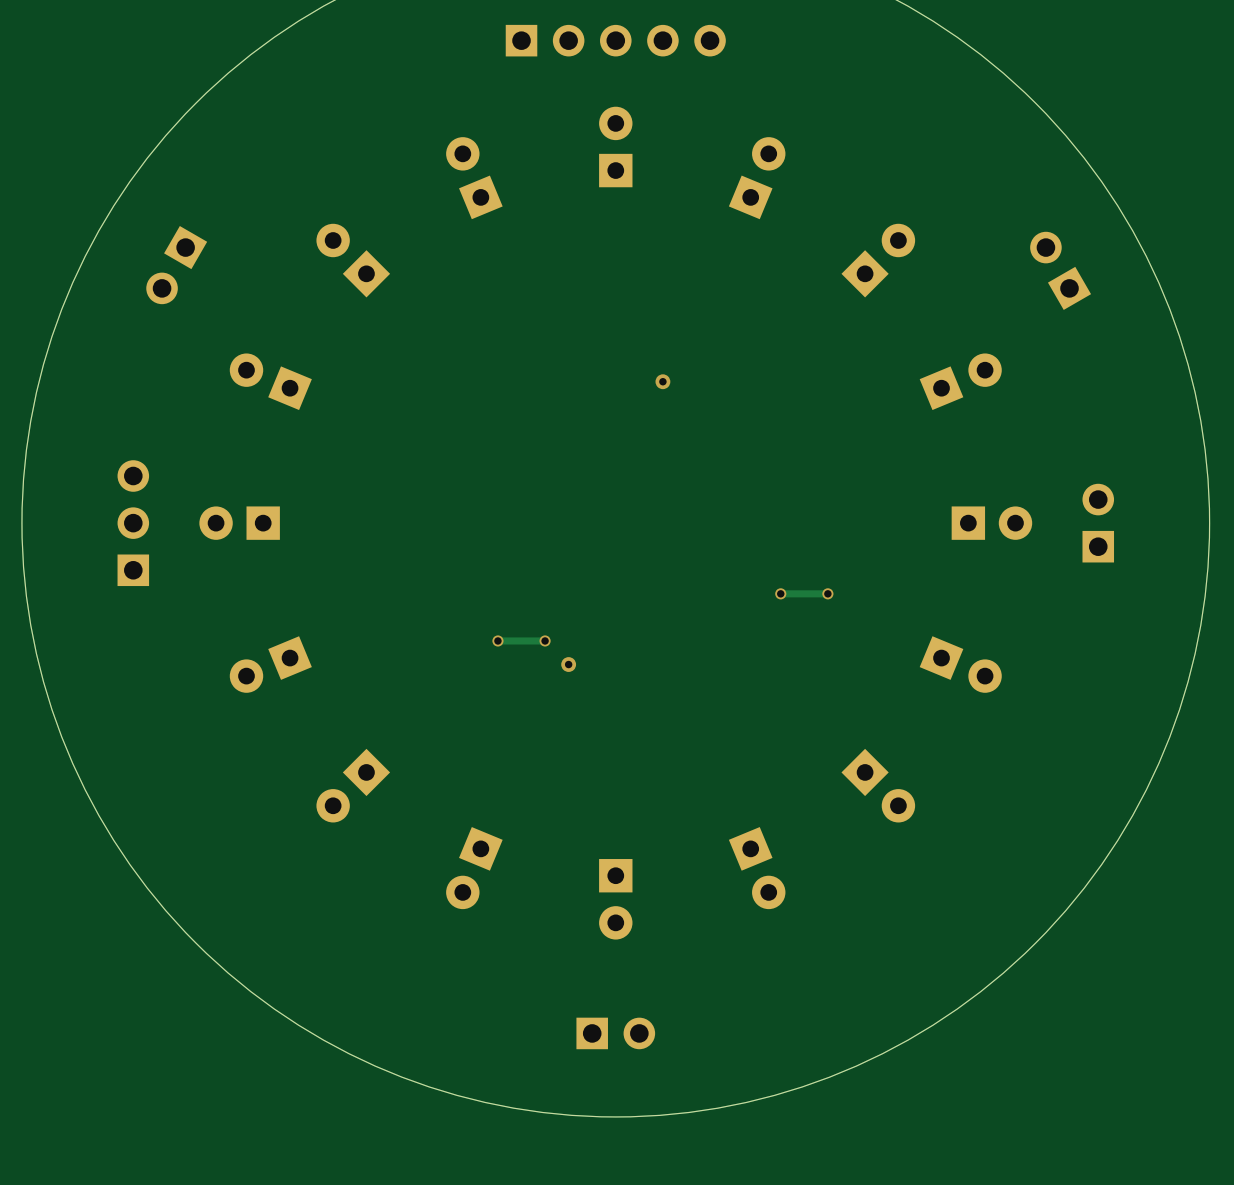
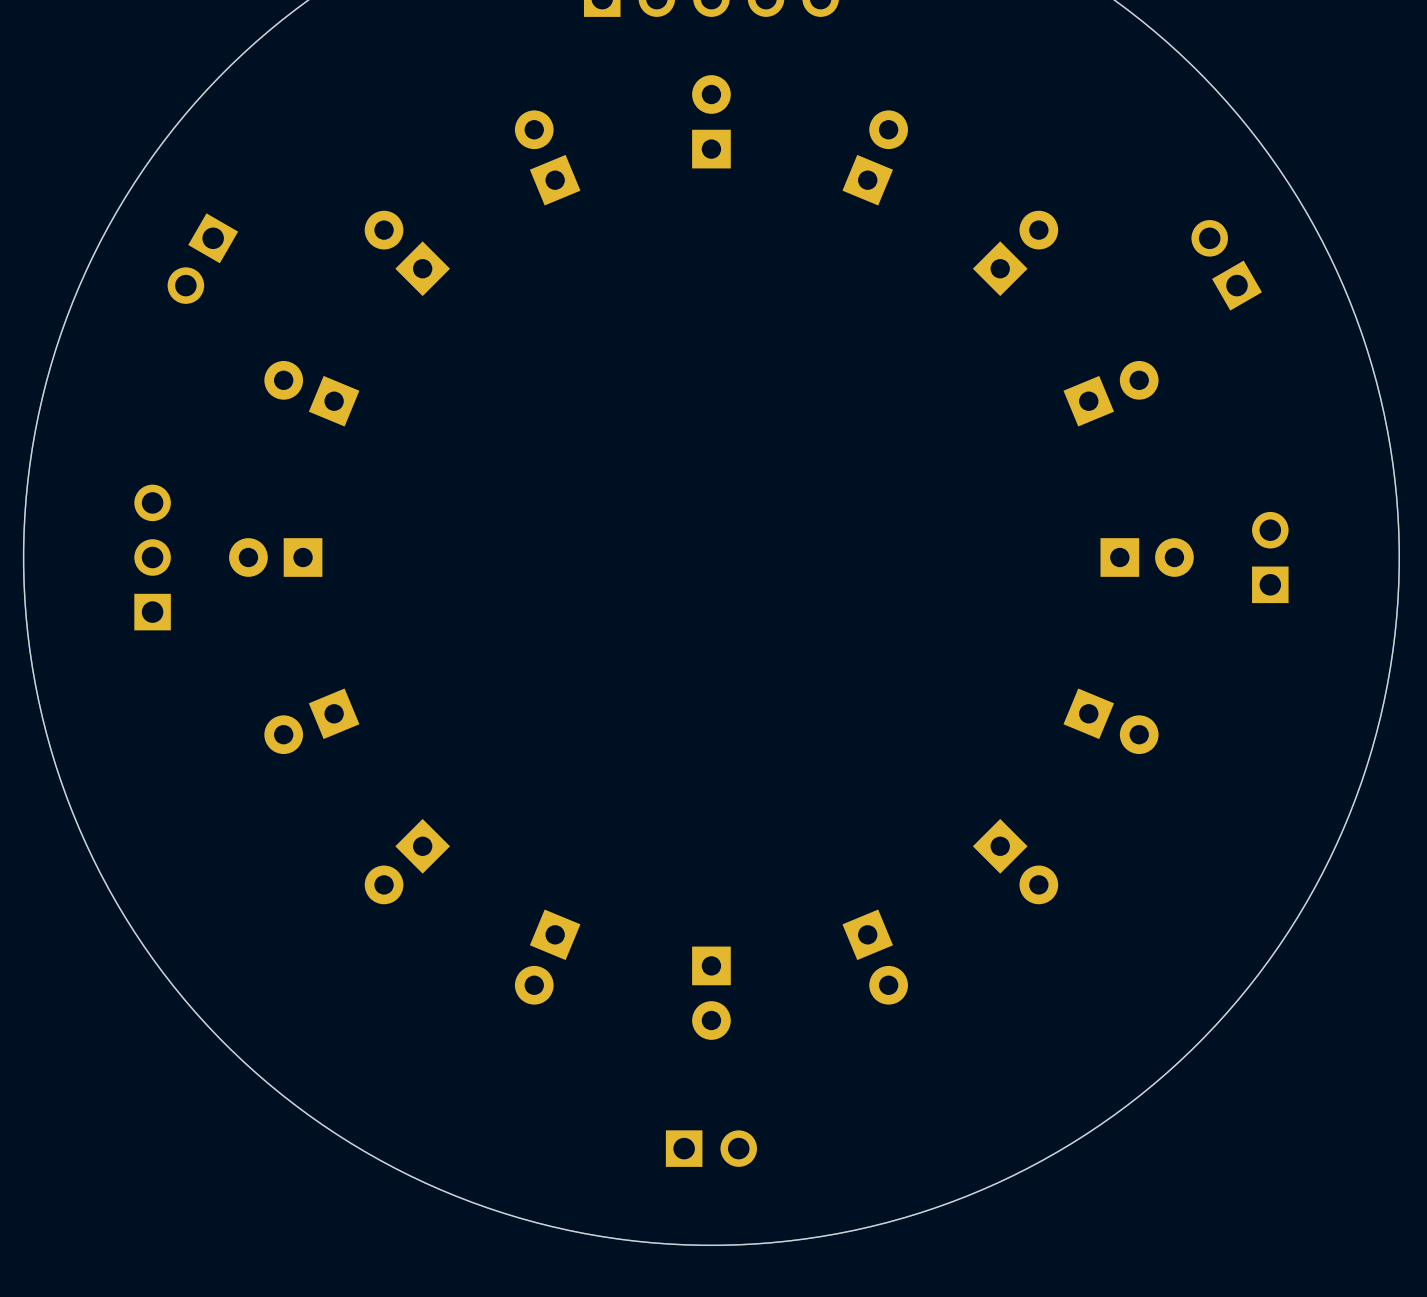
via: (662, 381) -> none
via: (780, 593) -> none
track: (827, 593) (780, 593) -> none
via: (827, 593) -> none
via: (497, 640) -> none
track: (545, 640) (497, 640) -> none
via: (545, 640) -> none
via: (568, 664) -> none

